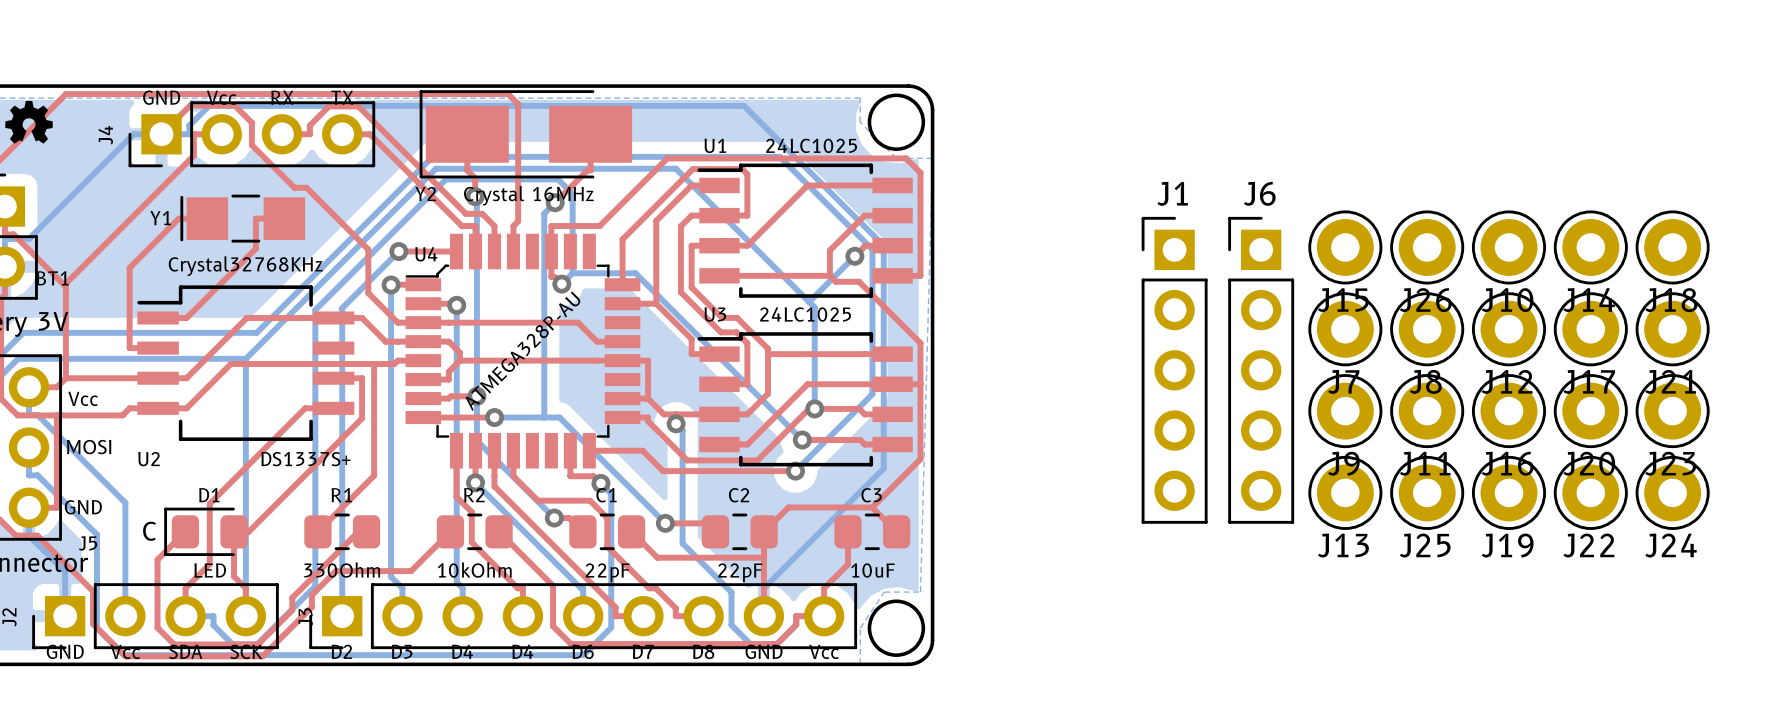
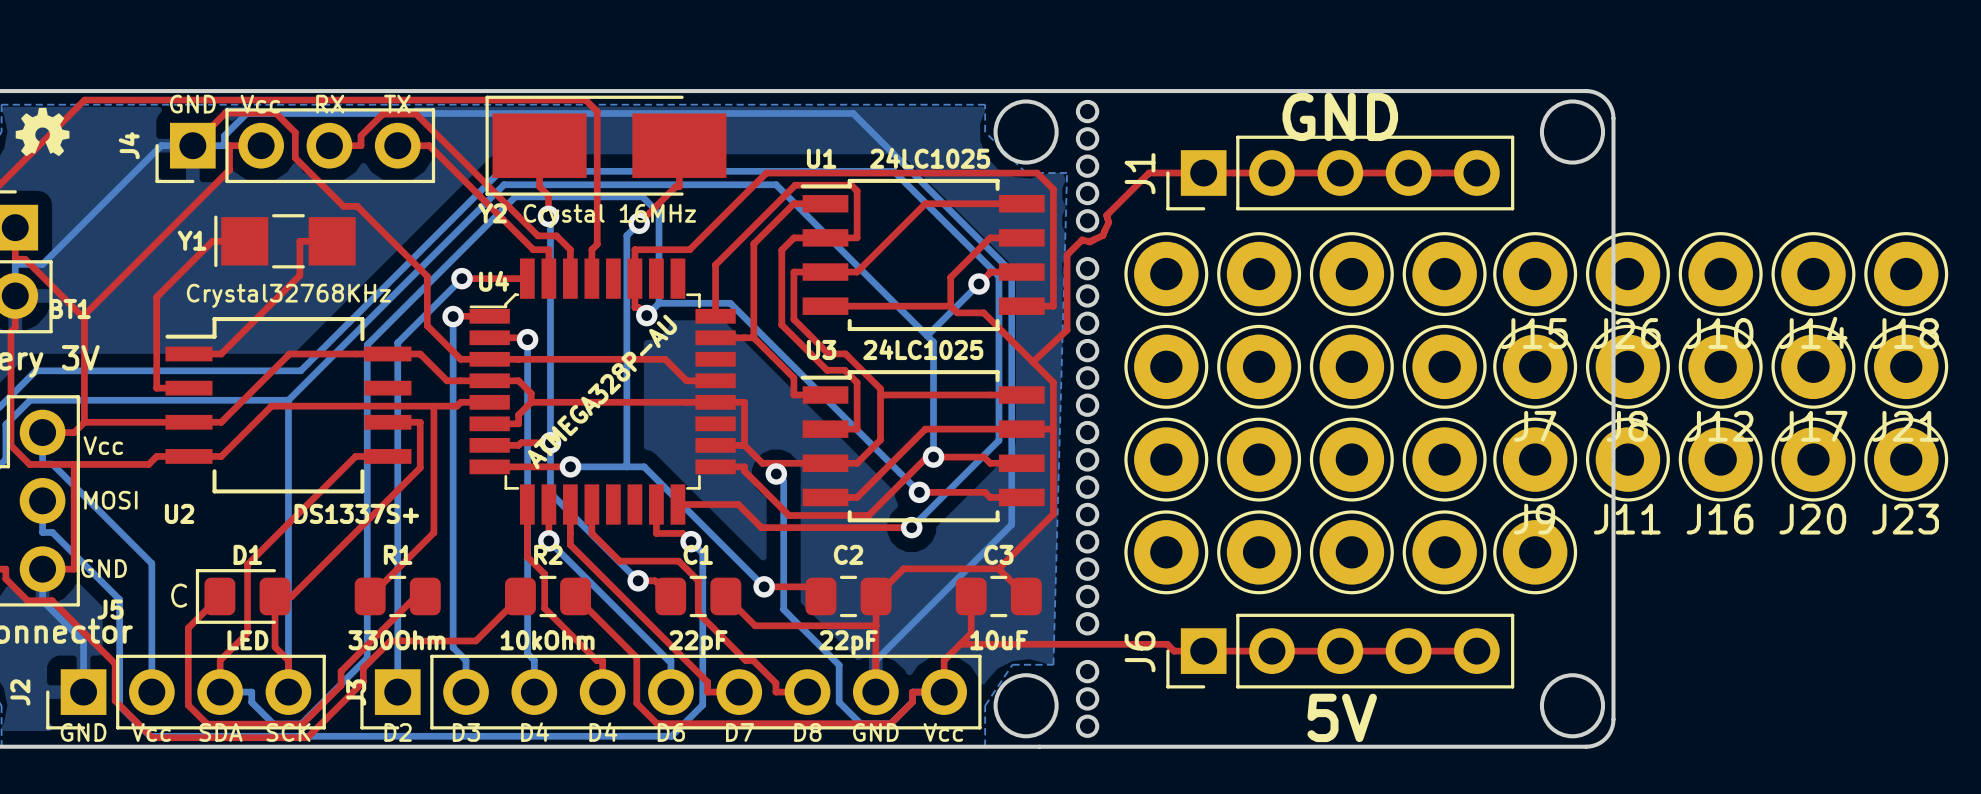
board edge: (908, 86) (917, 87) (925, 93) (930, 100) (932, 110) (932, 640) (930, 649) (925, 657) (917, 662) (908, 664) -> (1039, 91) (1586, 91) (1596, 93) (1605, 99) (1611, 107) (1613, 118) (1613, 719) (1611, 729) (1605, 738) (1596, 744) (1586, 746) (1039, 746)
round board edge: none -> [1075, 99, 1100, 124]
round board edge: none -> [1539, 99, 1606, 165]
text: none -> GND (1340, 116)
round board edge: none -> [1075, 127, 1100, 151]
round board edge: none -> [1075, 154, 1100, 178]
top track: none -> (1476, 173) (1149, 173) (1106, 215) (1108, 222) (1102, 235) (1089, 241) (1082, 239) (1067, 254) (1067, 330) (1032, 362)
round board edge: none -> [1075, 181, 1100, 206]
round board edge: none -> [1075, 209, 1100, 233]
round board edge: none -> [1075, 256, 1100, 281]
part: none -> (1166, 274)
part: none -> (1259, 274)
part: none -> (1351, 274)
part: none -> (1444, 274)
round board edge: none -> [1075, 284, 1100, 308]
round board edge: none -> [1075, 311, 1100, 335]
round board edge: none -> [1075, 338, 1100, 363]
round board edge: none -> [1075, 366, 1100, 390]
part: none -> (1166, 366)
part: none -> (1259, 366)
part: none -> (1351, 366)
part: none -> (1444, 366)
round board edge: none -> [1075, 393, 1100, 417]
J1 rotation: 0° (1174, 370) -> 90° counterclockwise (1340, 173)
J1 position: (1174, 370) -> (1340, 173)
J6 rotation: 0° (1261, 370) -> 90° counterclockwise (1340, 651)
J6 position: (1261, 370) -> (1340, 651)
round board edge: none -> [1075, 420, 1100, 445]
round board edge: none -> [1075, 448, 1100, 472]
part: none -> (1166, 459)
part: none -> (1259, 459)
part: none -> (1351, 459)
part: none -> (1444, 459)
round board edge: none -> [1075, 475, 1100, 499]
round board edge: none -> [1075, 502, 1100, 527]
round board edge: none -> [1075, 530, 1100, 554]
part: none -> (1166, 552)
part: none -> (1259, 552)
part: none -> (1351, 552)
part: none -> (1444, 552)
J25: (1427, 492) -> none
J19: (1509, 492) -> none
J22: (1590, 492) -> none
J24: (1672, 492) -> none
round board edge: none -> [1075, 557, 1100, 581]
round board edge: none -> [1075, 584, 1100, 609]
round board edge: none -> [1075, 612, 1100, 636]
J13 name: J13 (1343, 545) -> none
top track: none -> (960, 644) (1167, 644) (1174, 651) (1476, 651)
round board edge: none -> [1075, 659, 1100, 684]
round board edge: none -> [1539, 673, 1606, 739]
round board edge: none -> [1075, 687, 1100, 711]
round board edge: none -> [1075, 714, 1100, 738]
text: none -> 5V (1342, 717)

